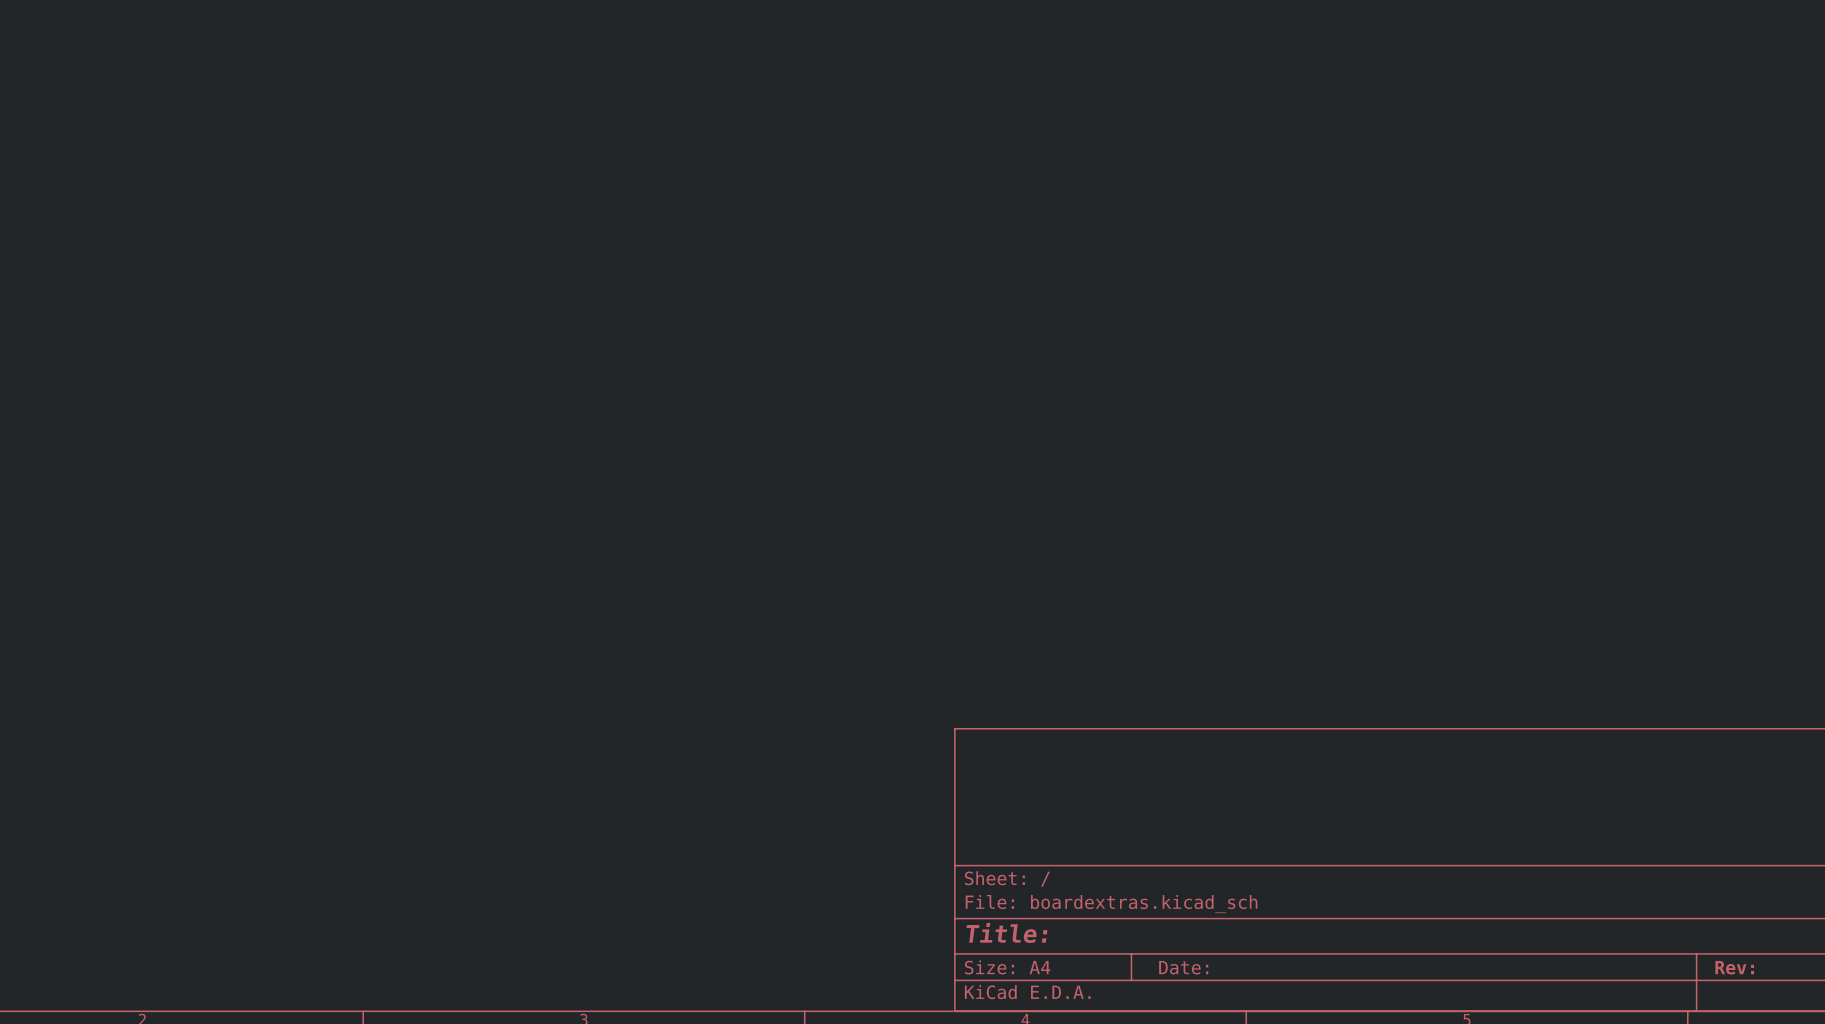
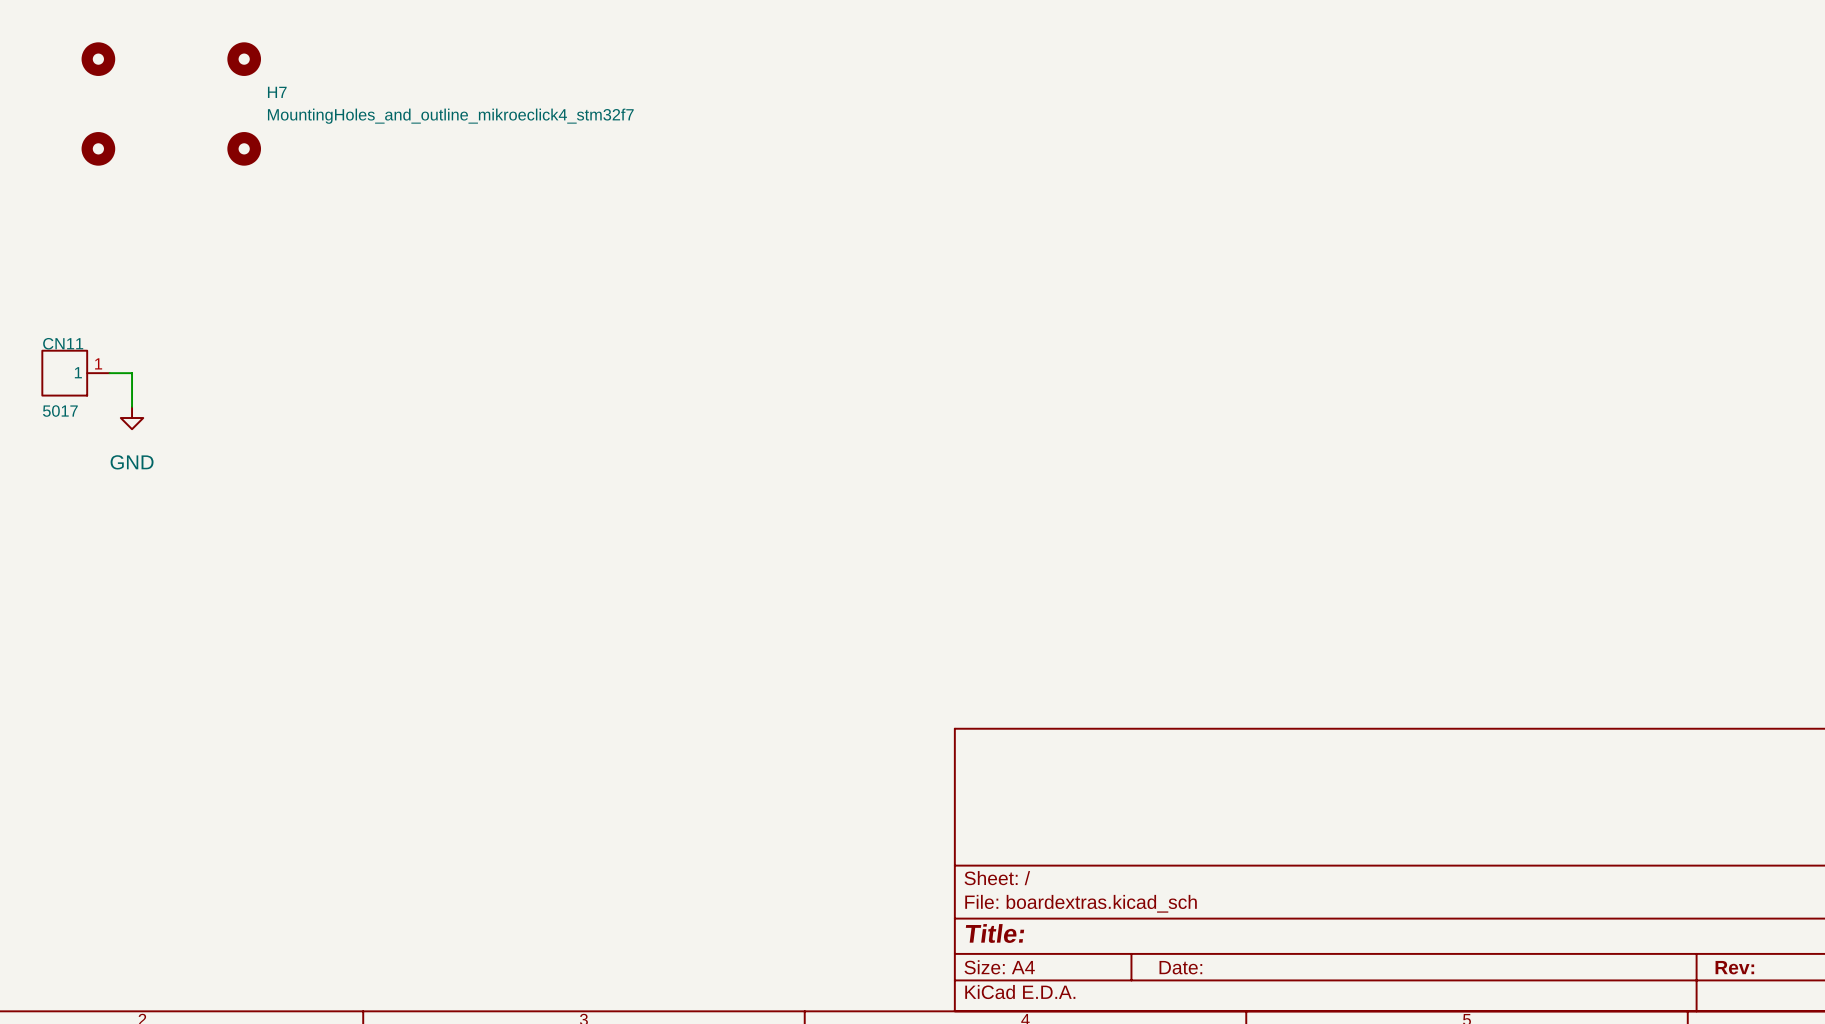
H7: none -> MountingHoles_and_outline_mikroeclick4_stm32f7 (171, 104)
CN11: none -> 5017 (75, 373)
wire: none -> (109, 373) (132, 373) (132, 406)
power symbol: none -> GND (132, 418)

